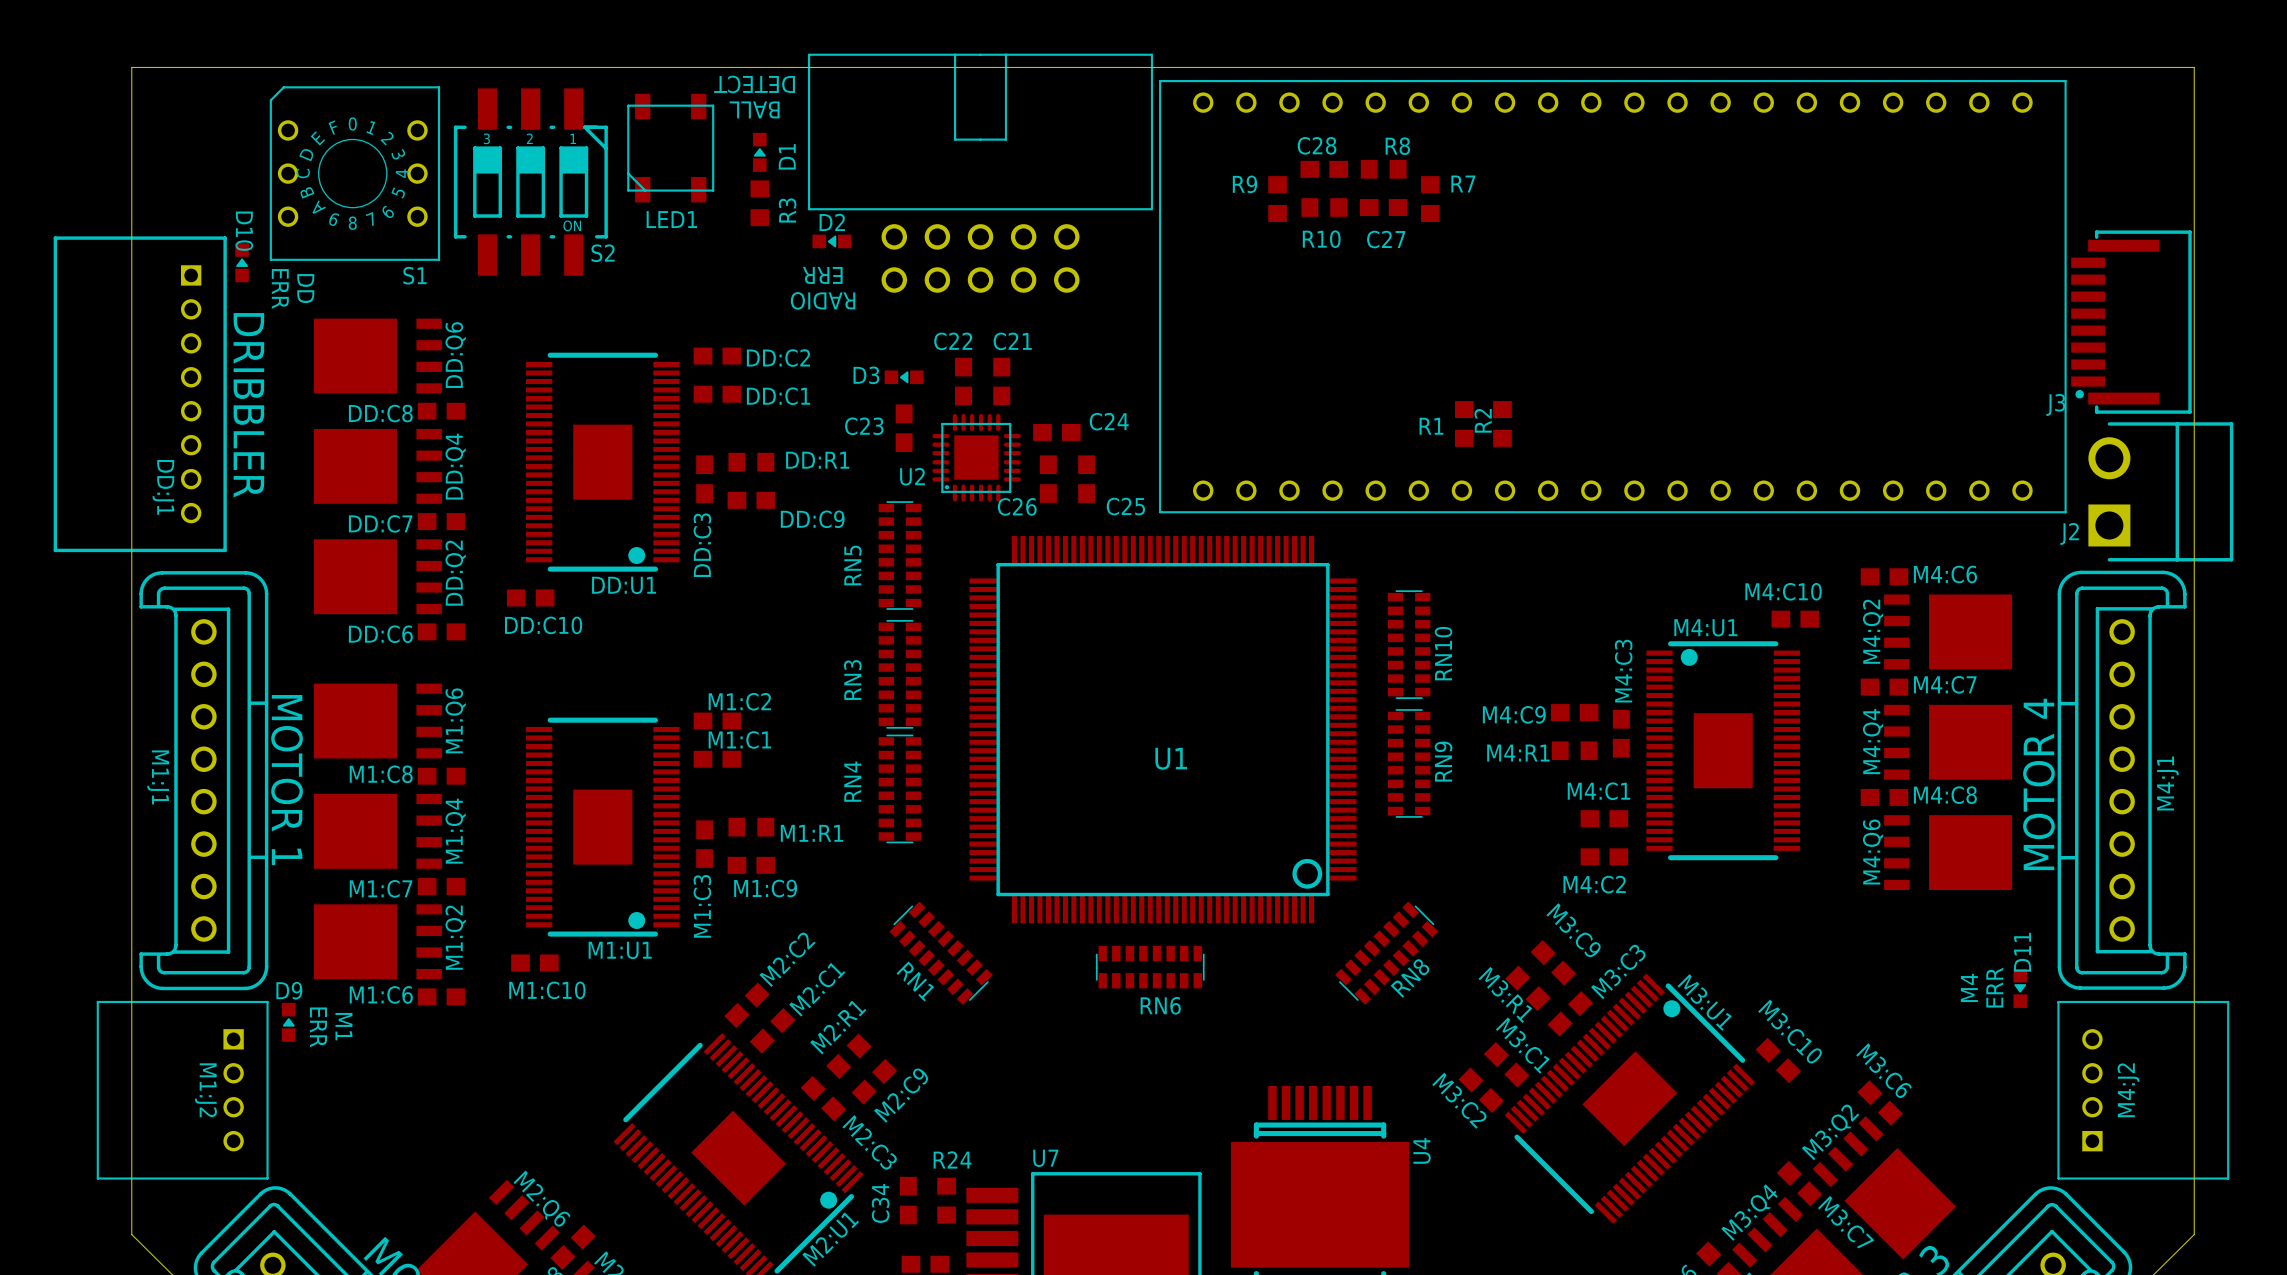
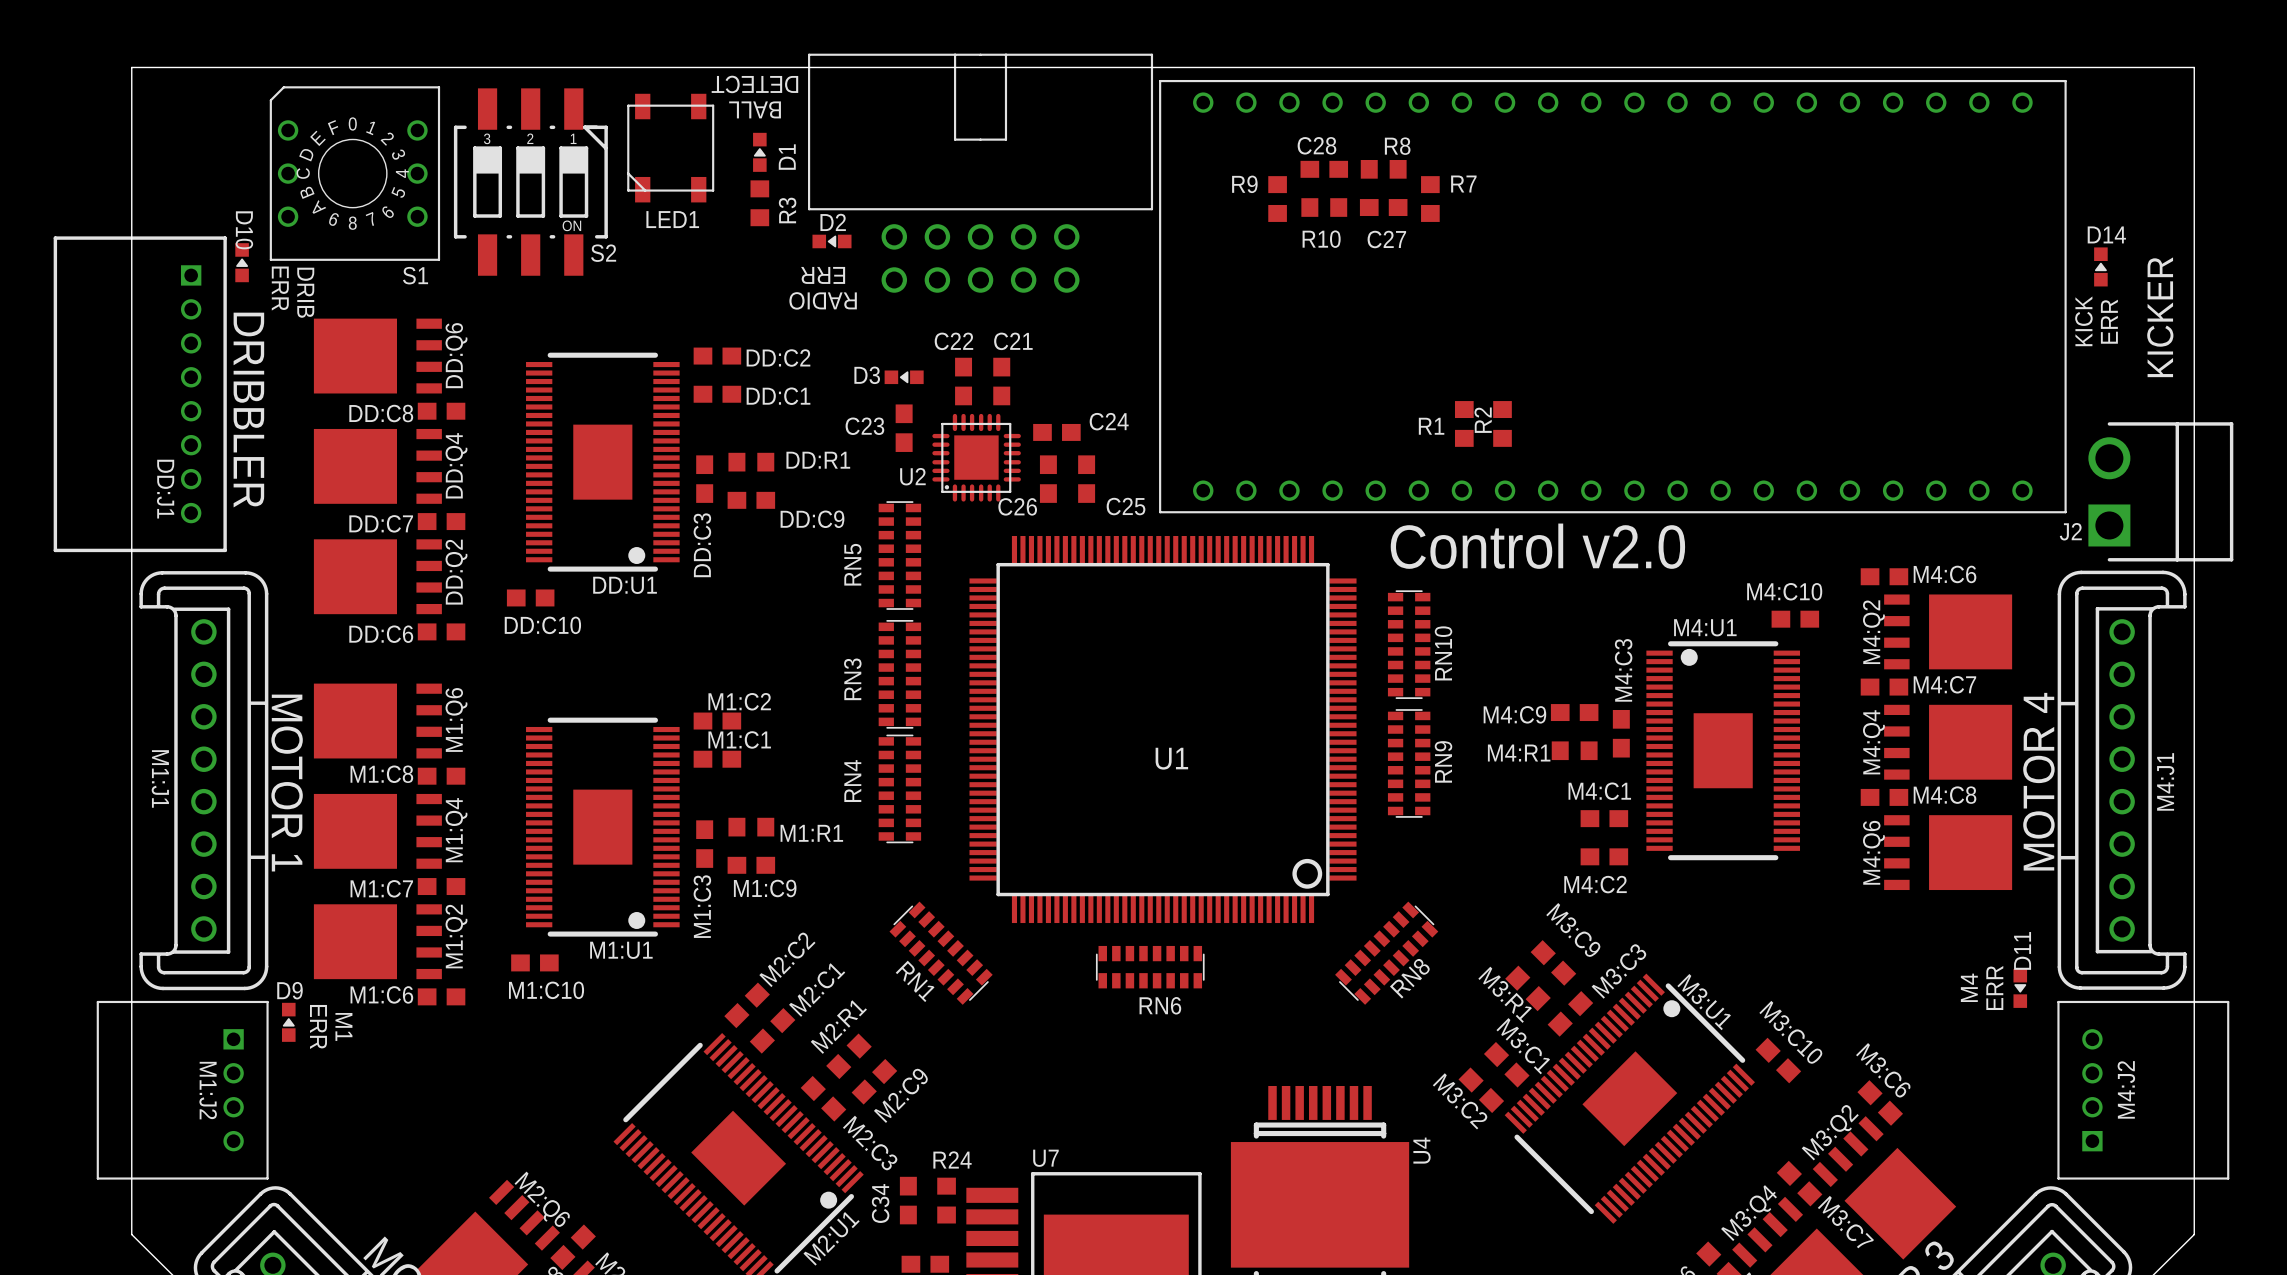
D14: none -> (2100, 266)
text: DD (305, 288) -> DRIB (305, 292)
text: none -> KICKER (2160, 317)
text: none -> KICK (2083, 321)
text: none -> ERR (2109, 321)
J3: (2131, 322) -> none
text: none -> Control v2.0 (1537, 546)

